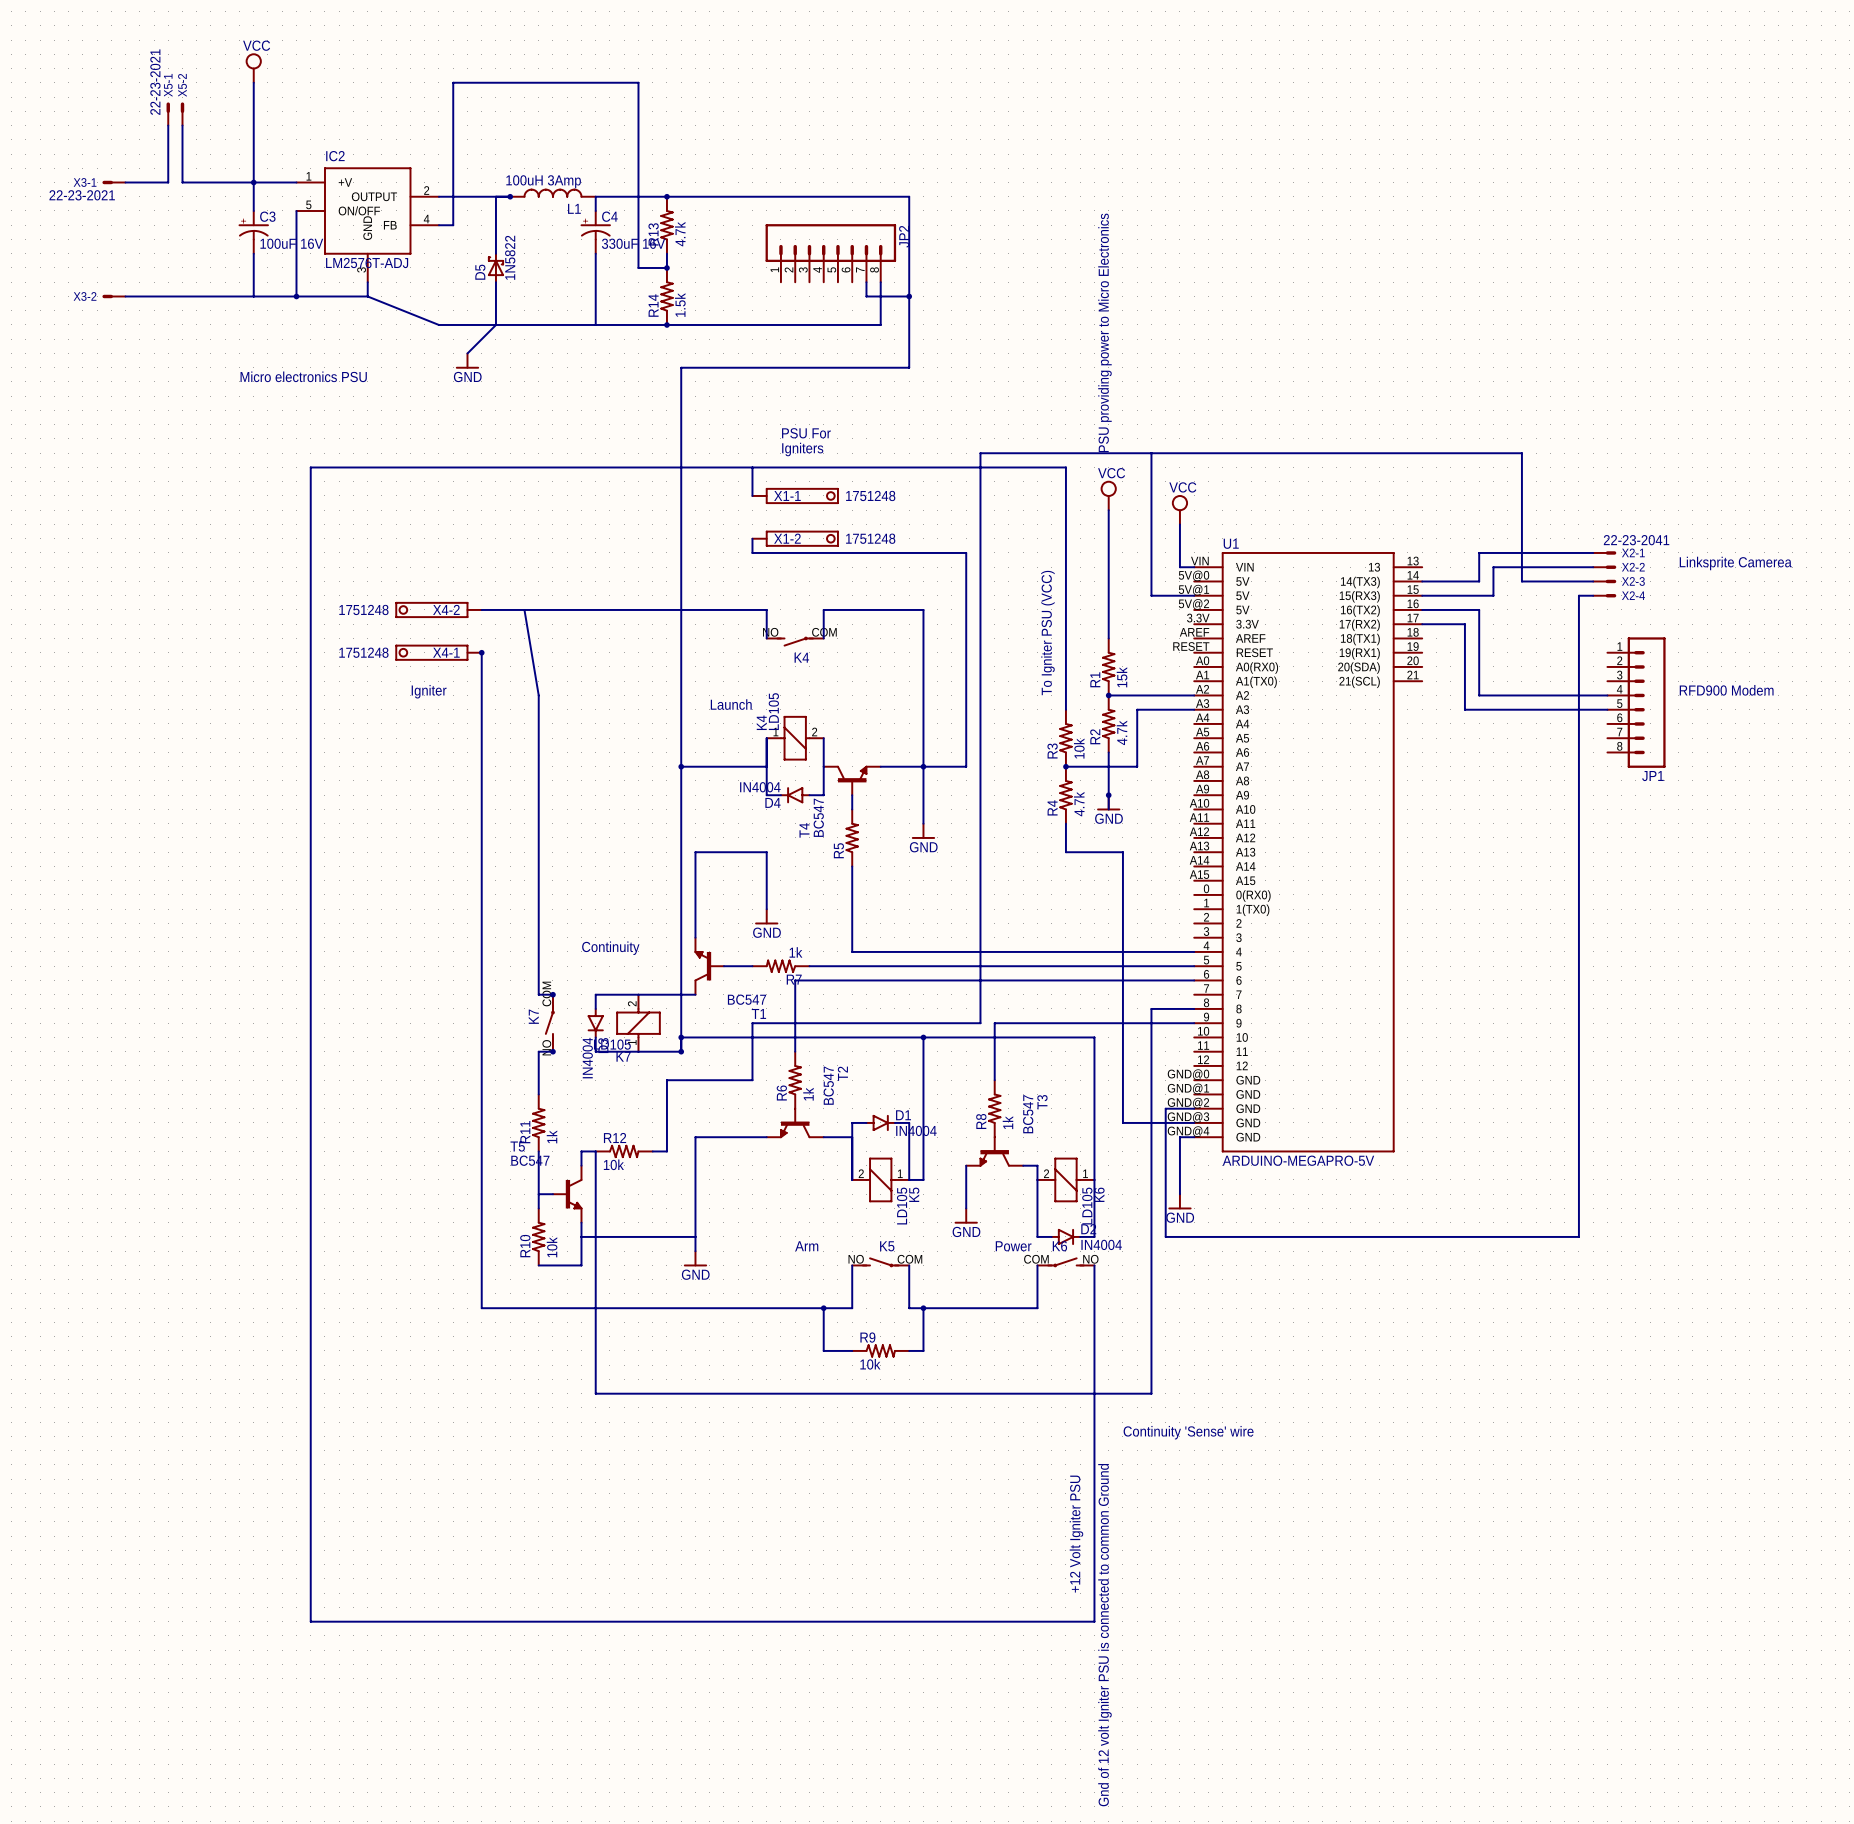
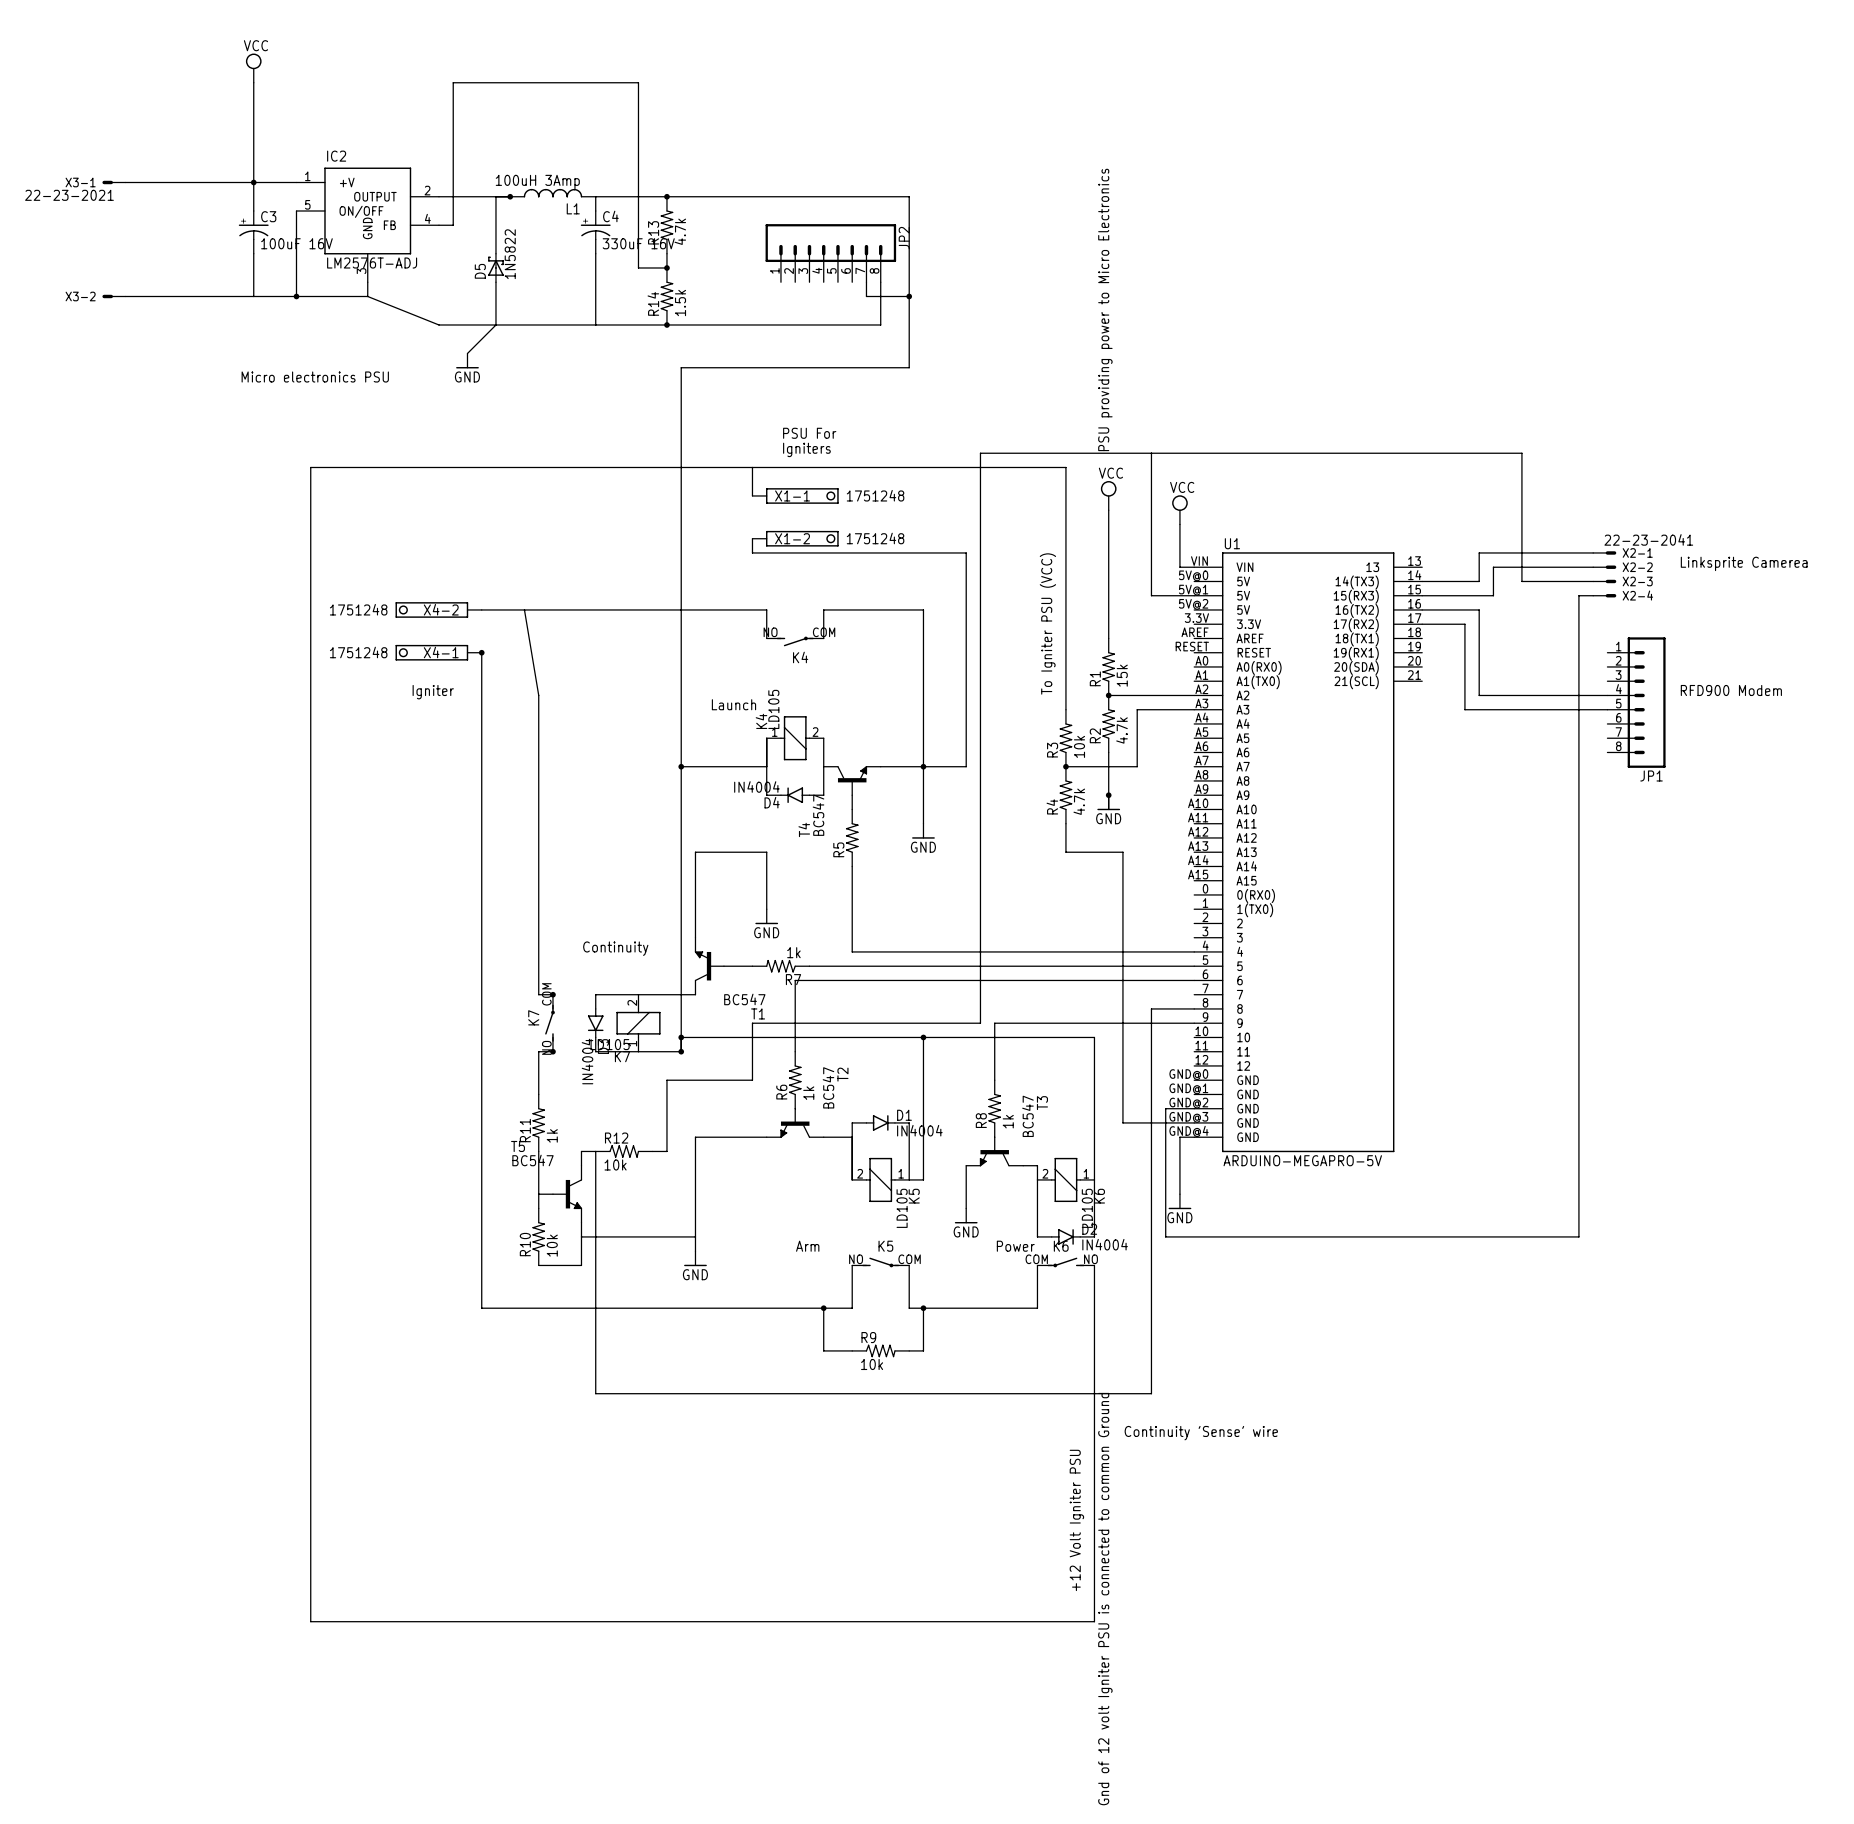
X5-1: 22-23-2021 (168, 113) -> none
X5-2: (182, 113) -> none
wire: (168, 125) (168, 182) -> (182, 182) (168, 182)
wire: (182, 125) (182, 182) -> none

